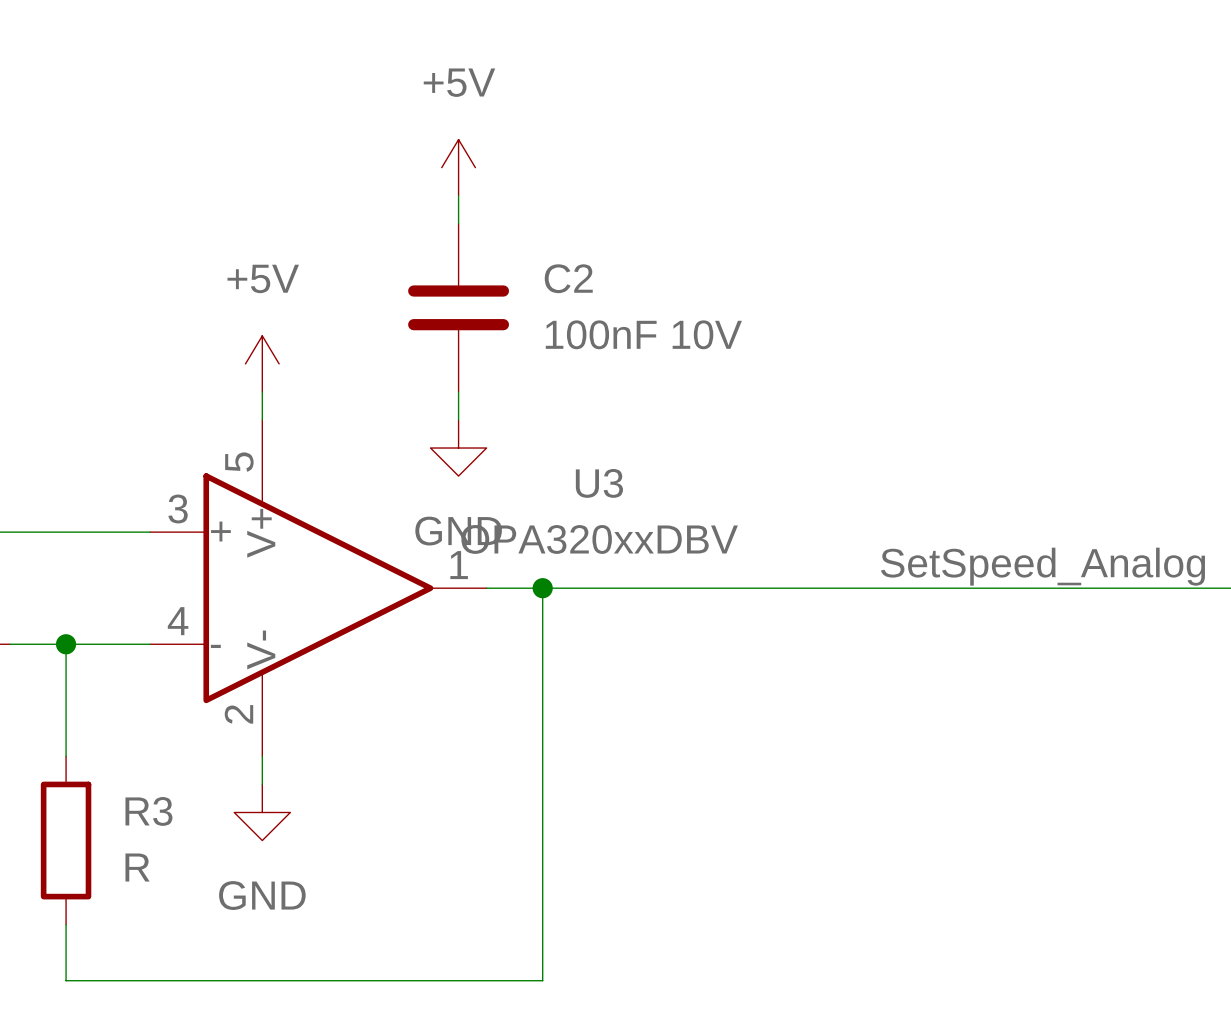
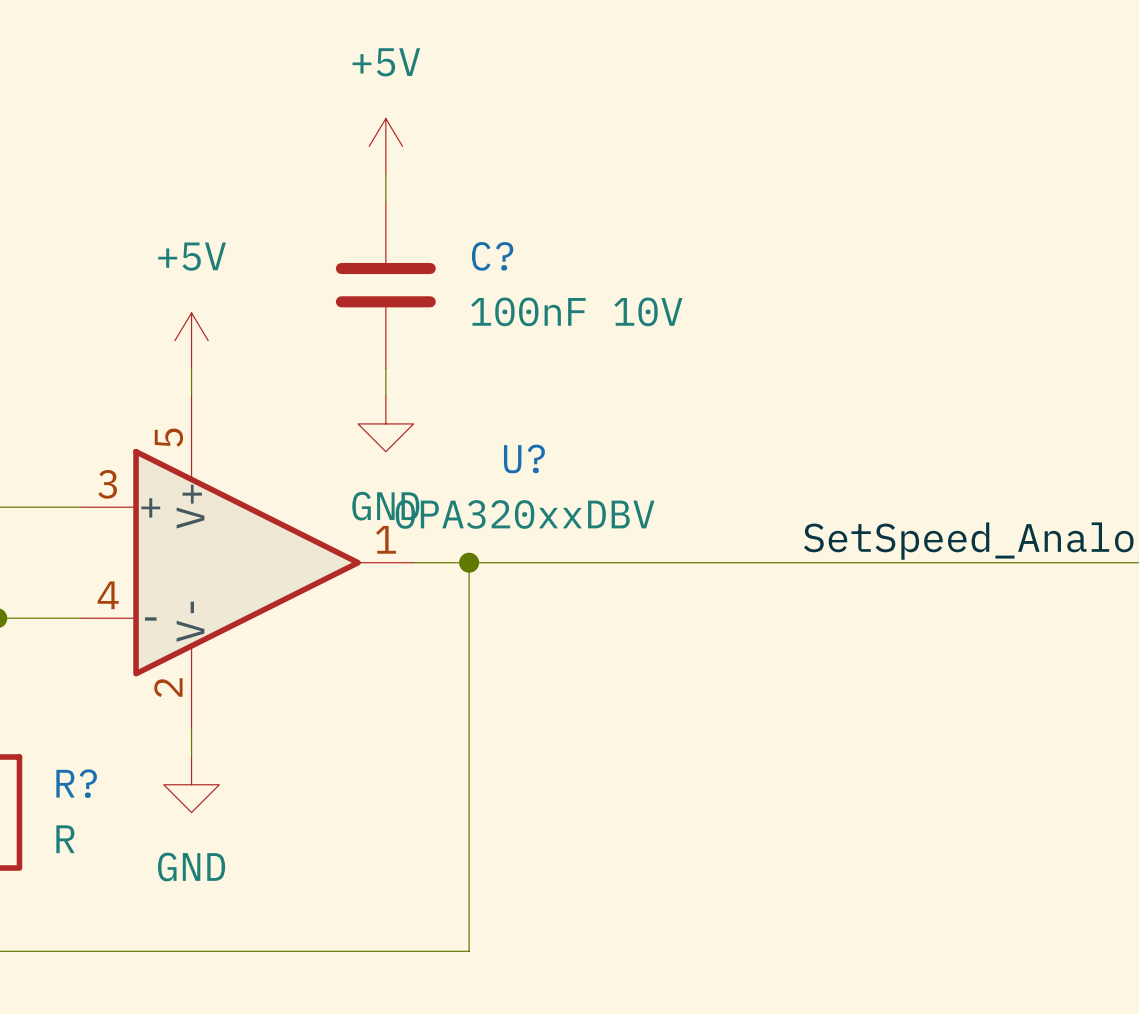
C2 name: C2 (568, 278) -> C? (492, 256)
U3 name: U3 (599, 483) -> U? (524, 458)
R3 name: R3 (148, 811) -> R? (76, 783)

